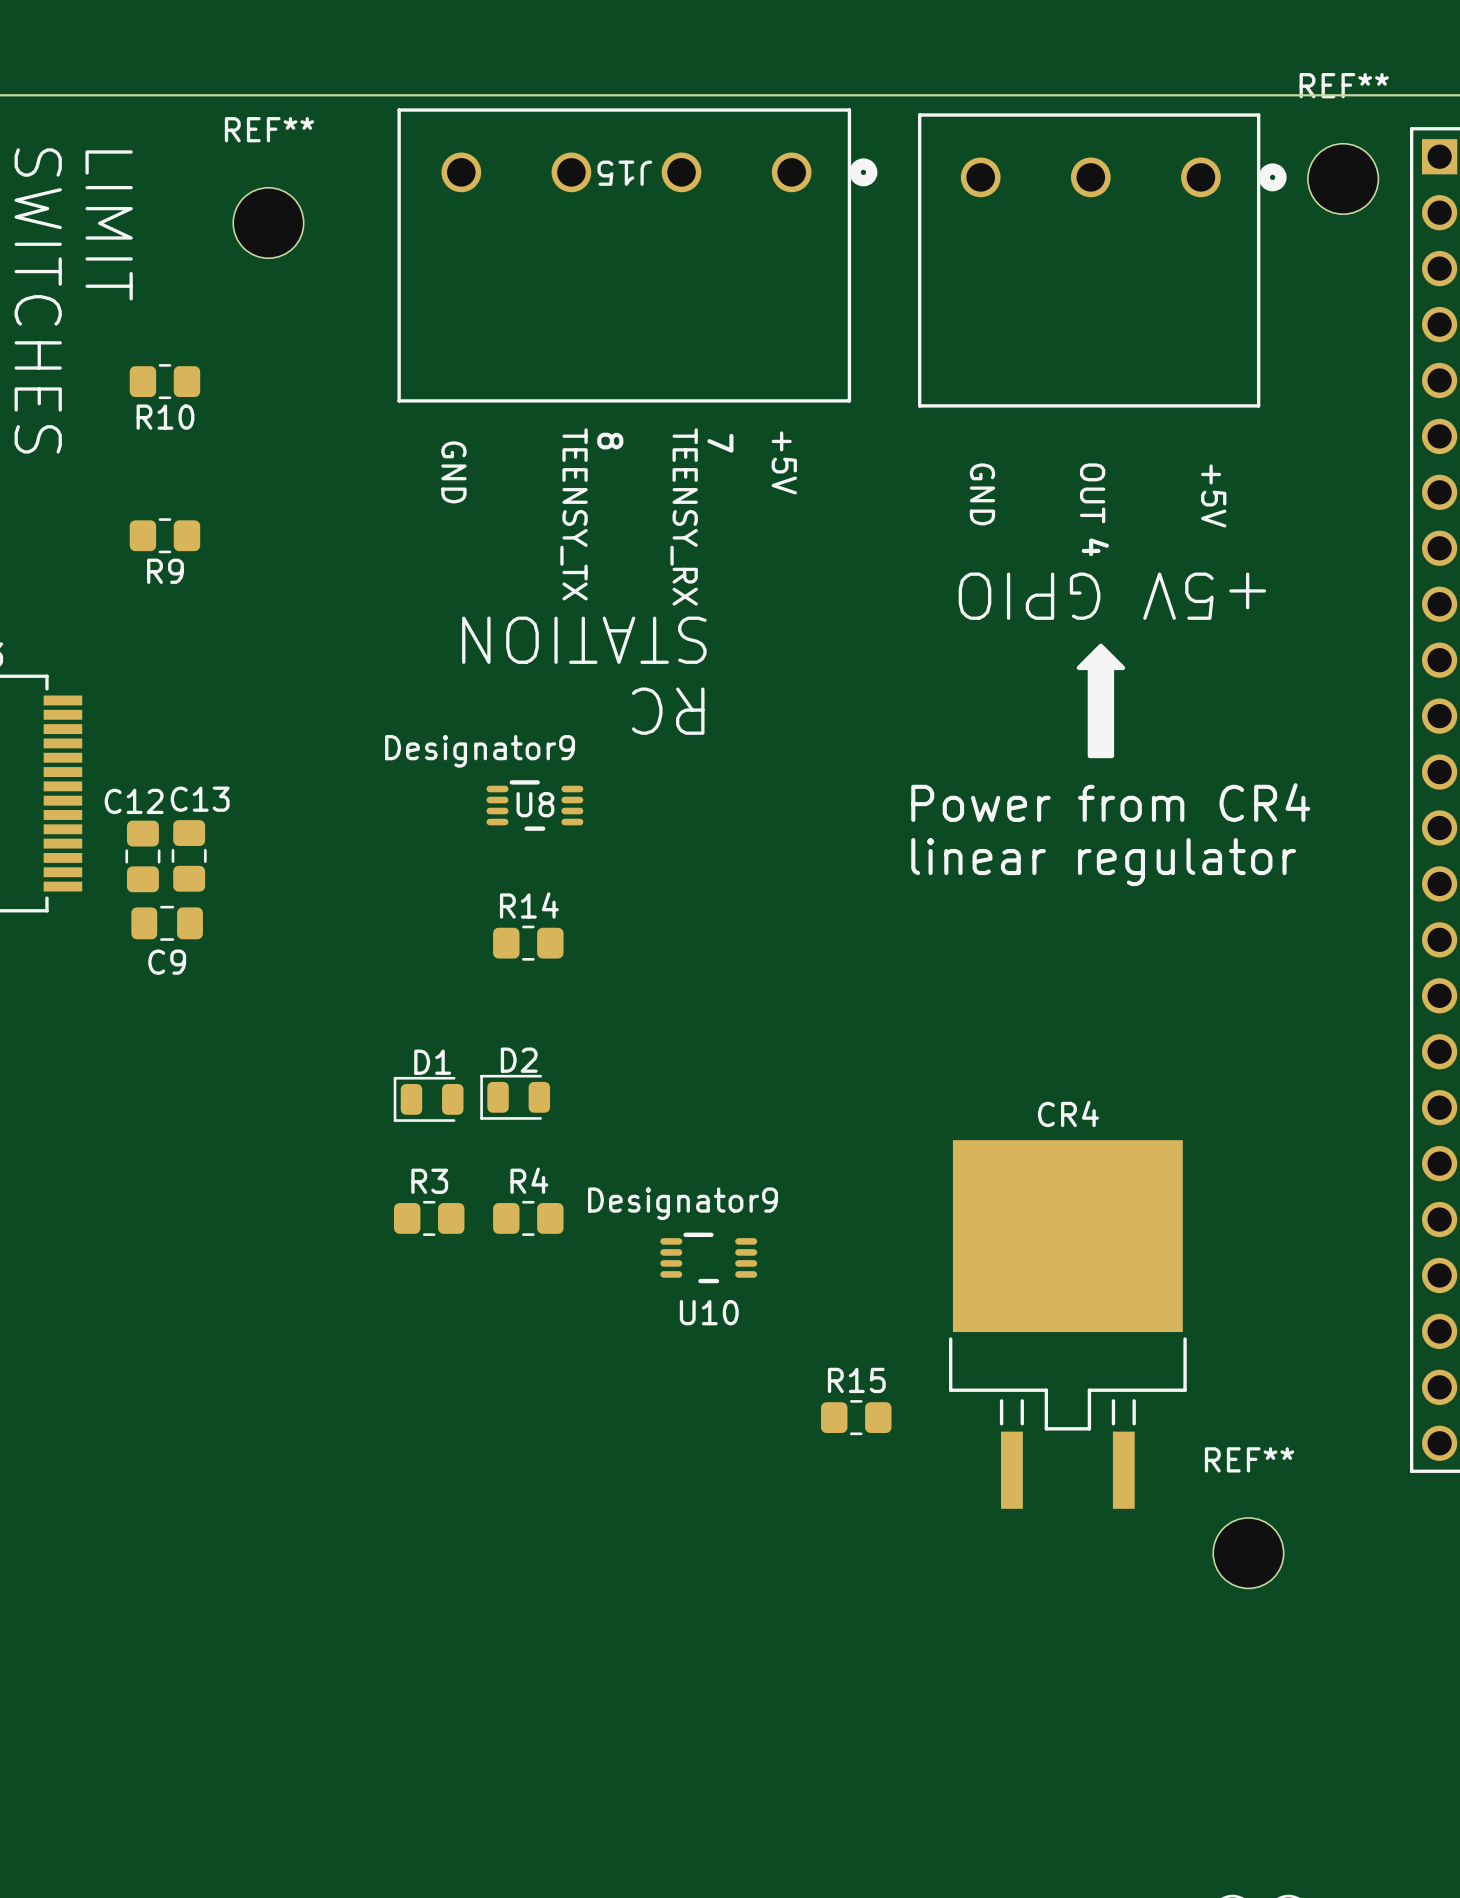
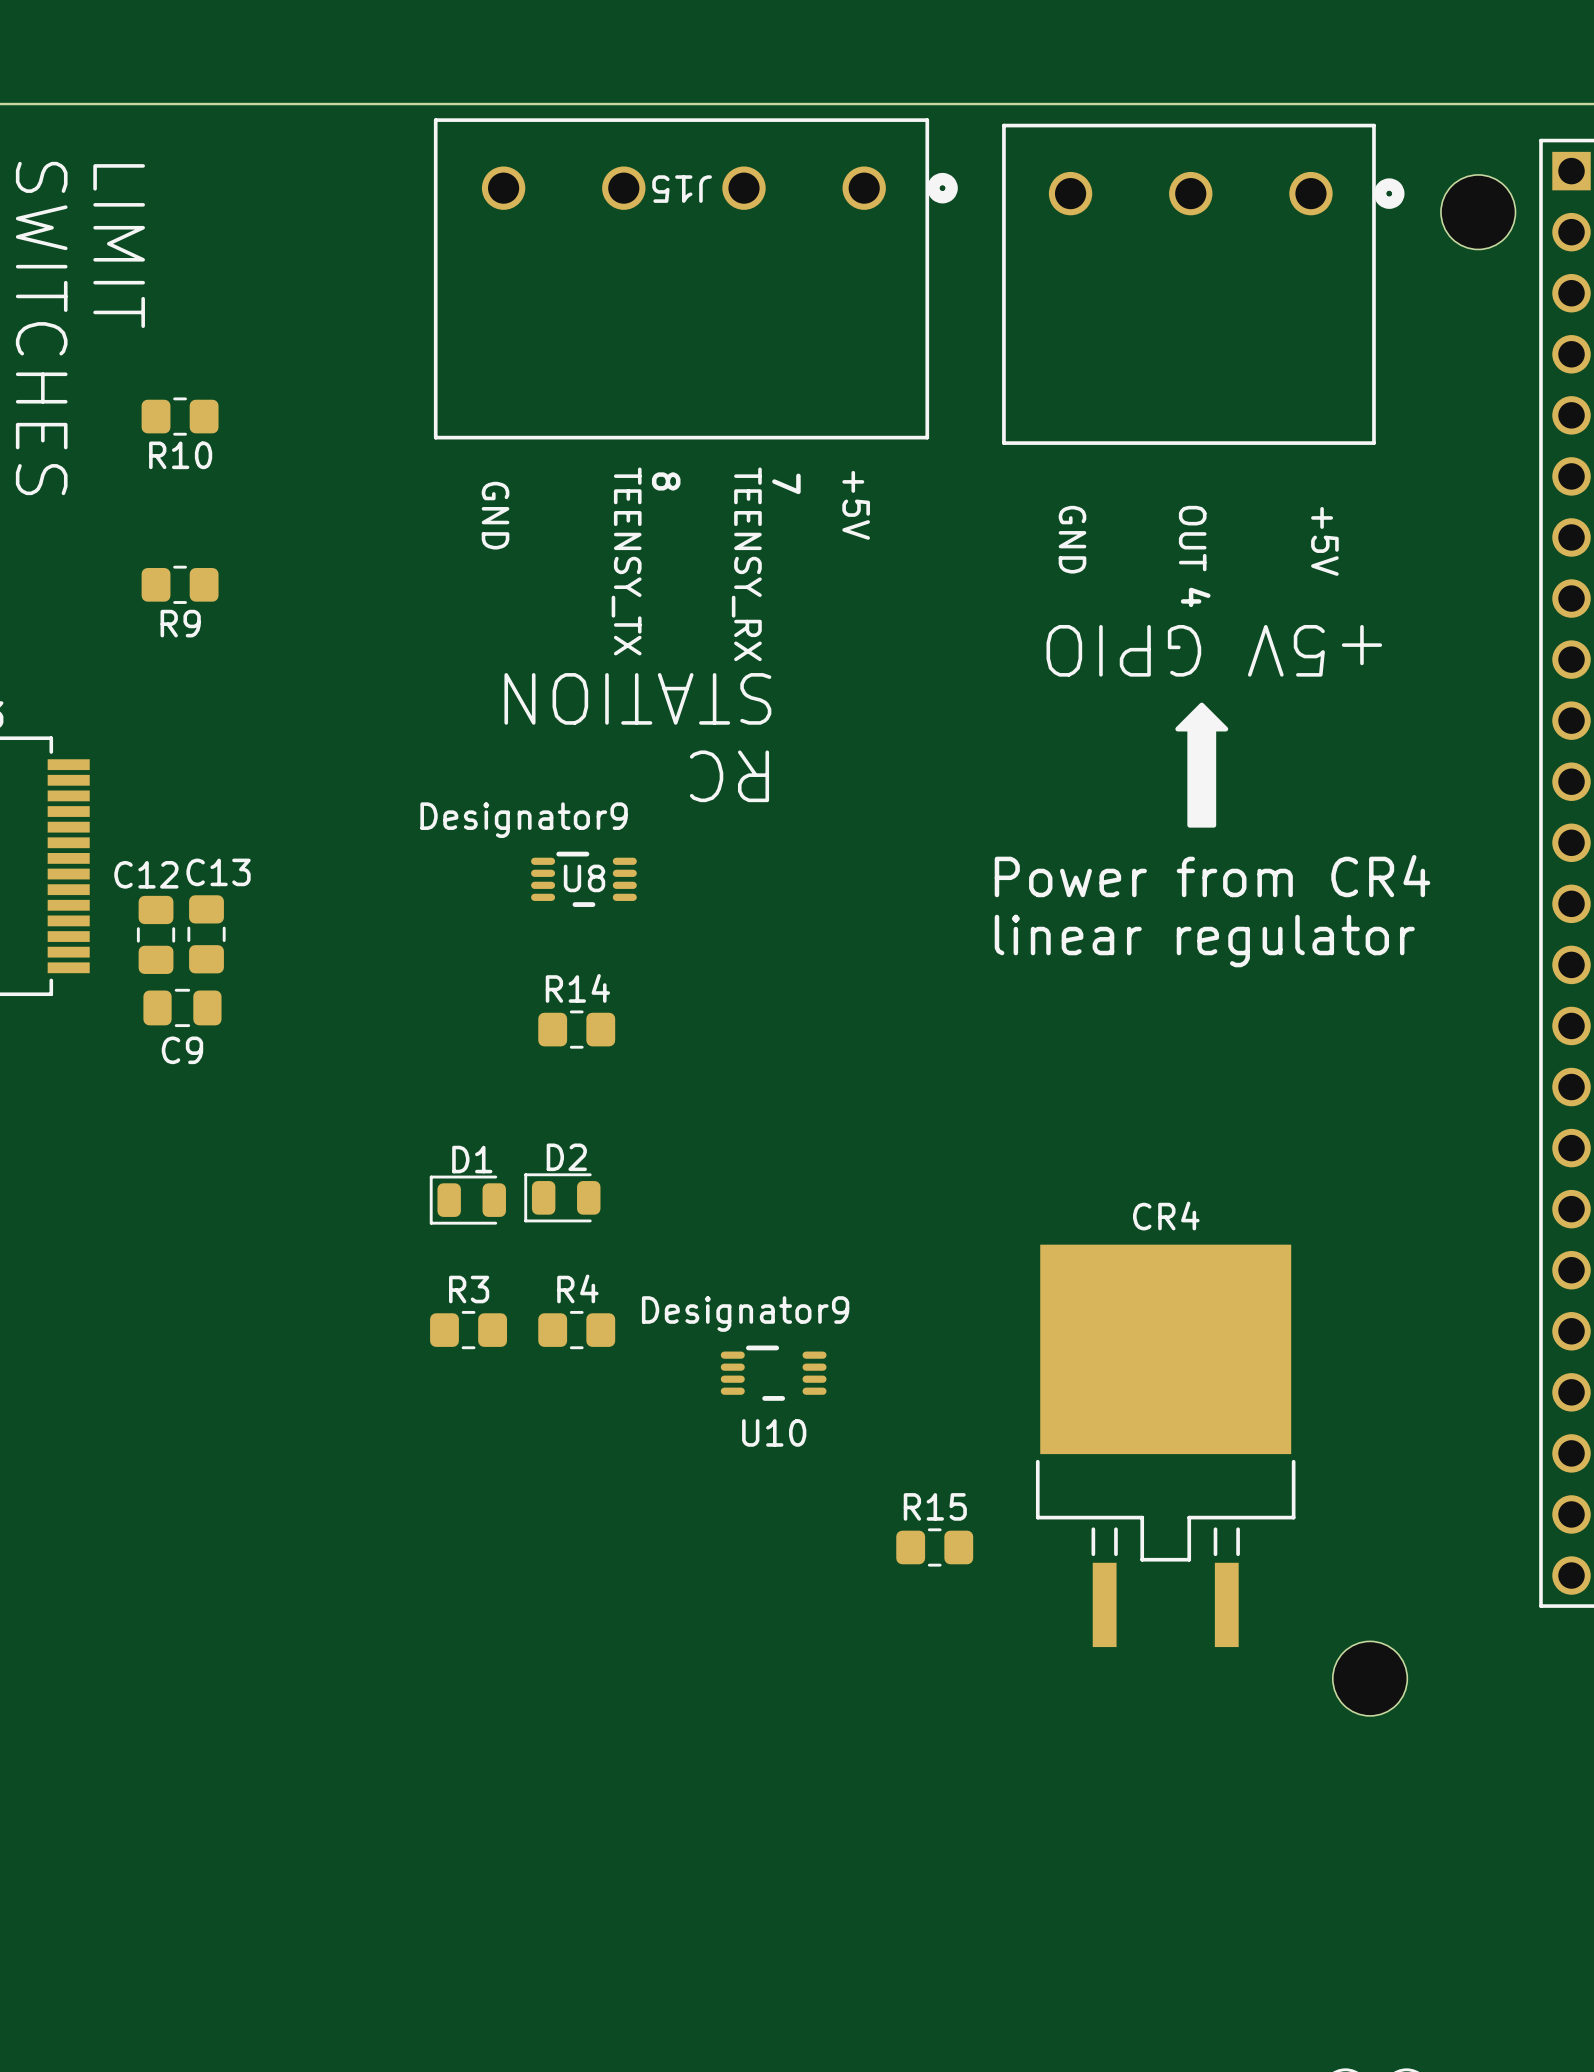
REF**: (1343, 178) -> none
part: none -> (1478, 212)
REF**: (268, 223) -> none
part: none -> (1370, 1678)
REF**: (1248, 1553) -> none

